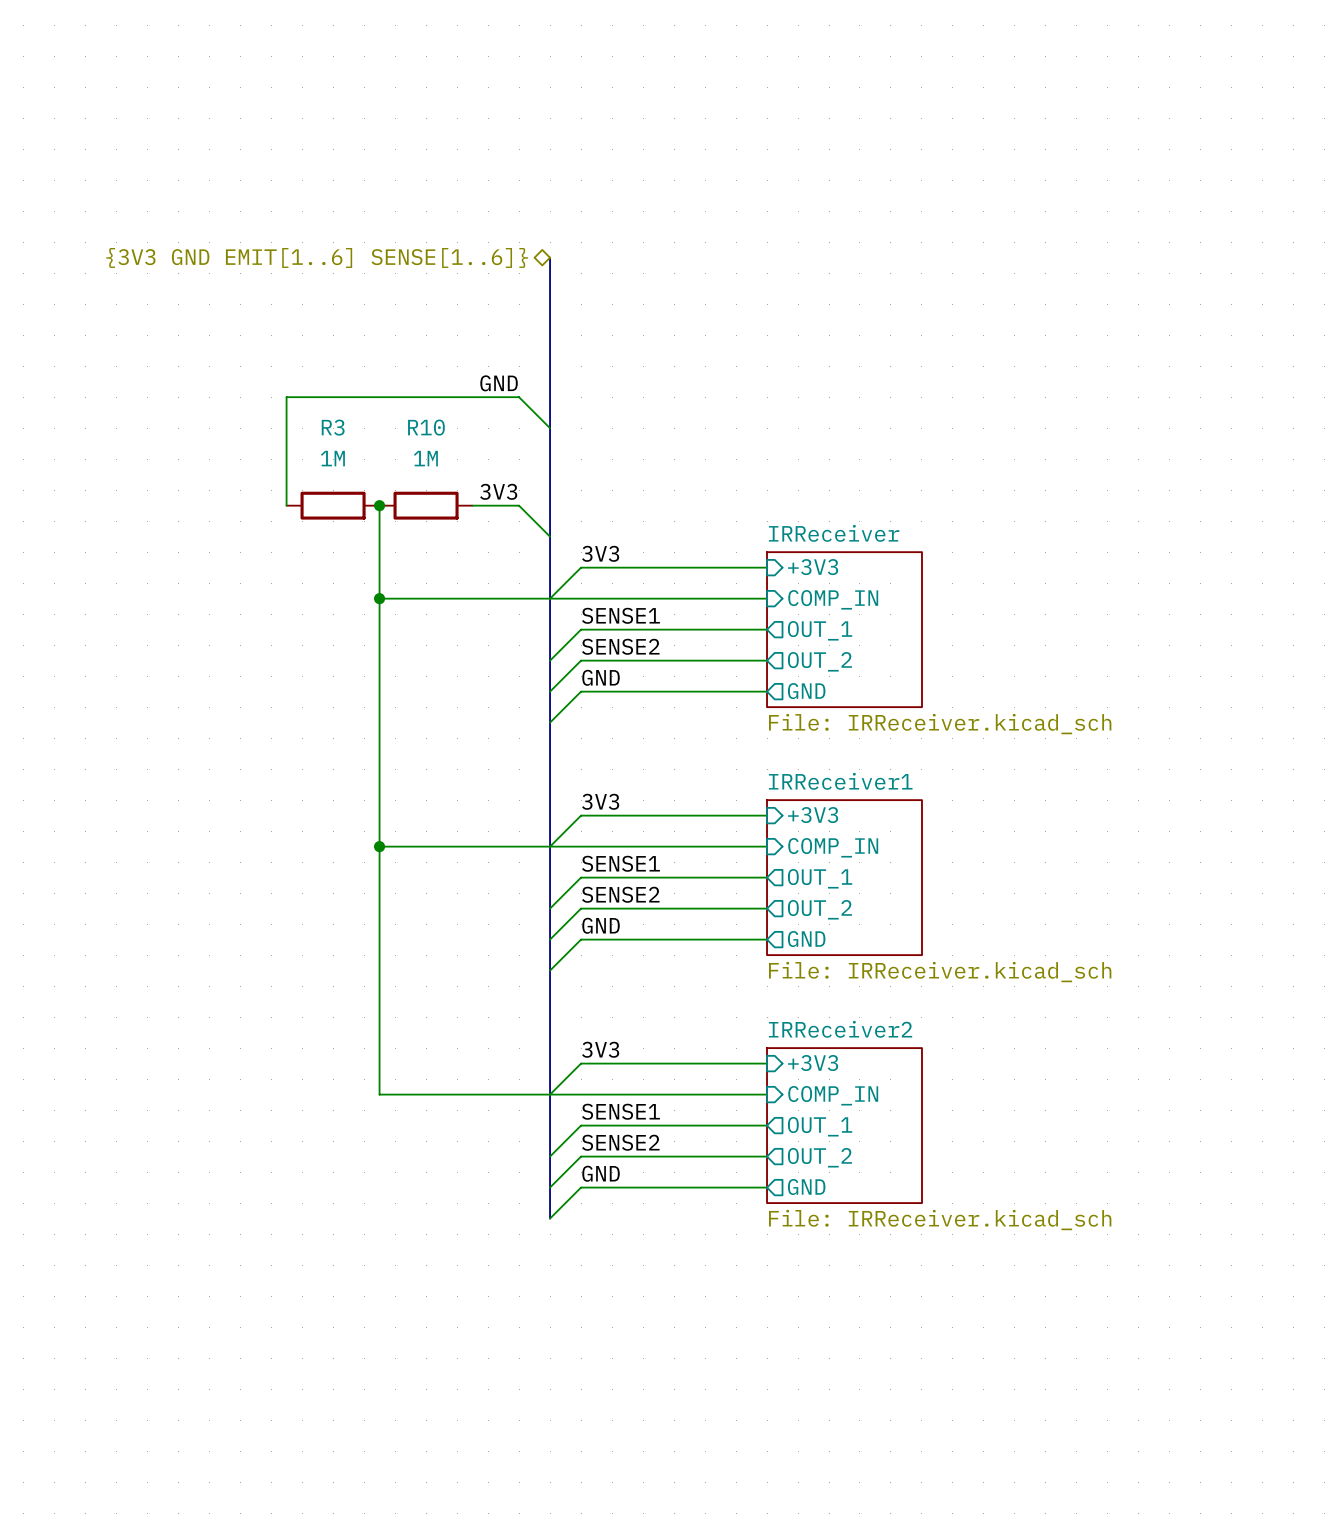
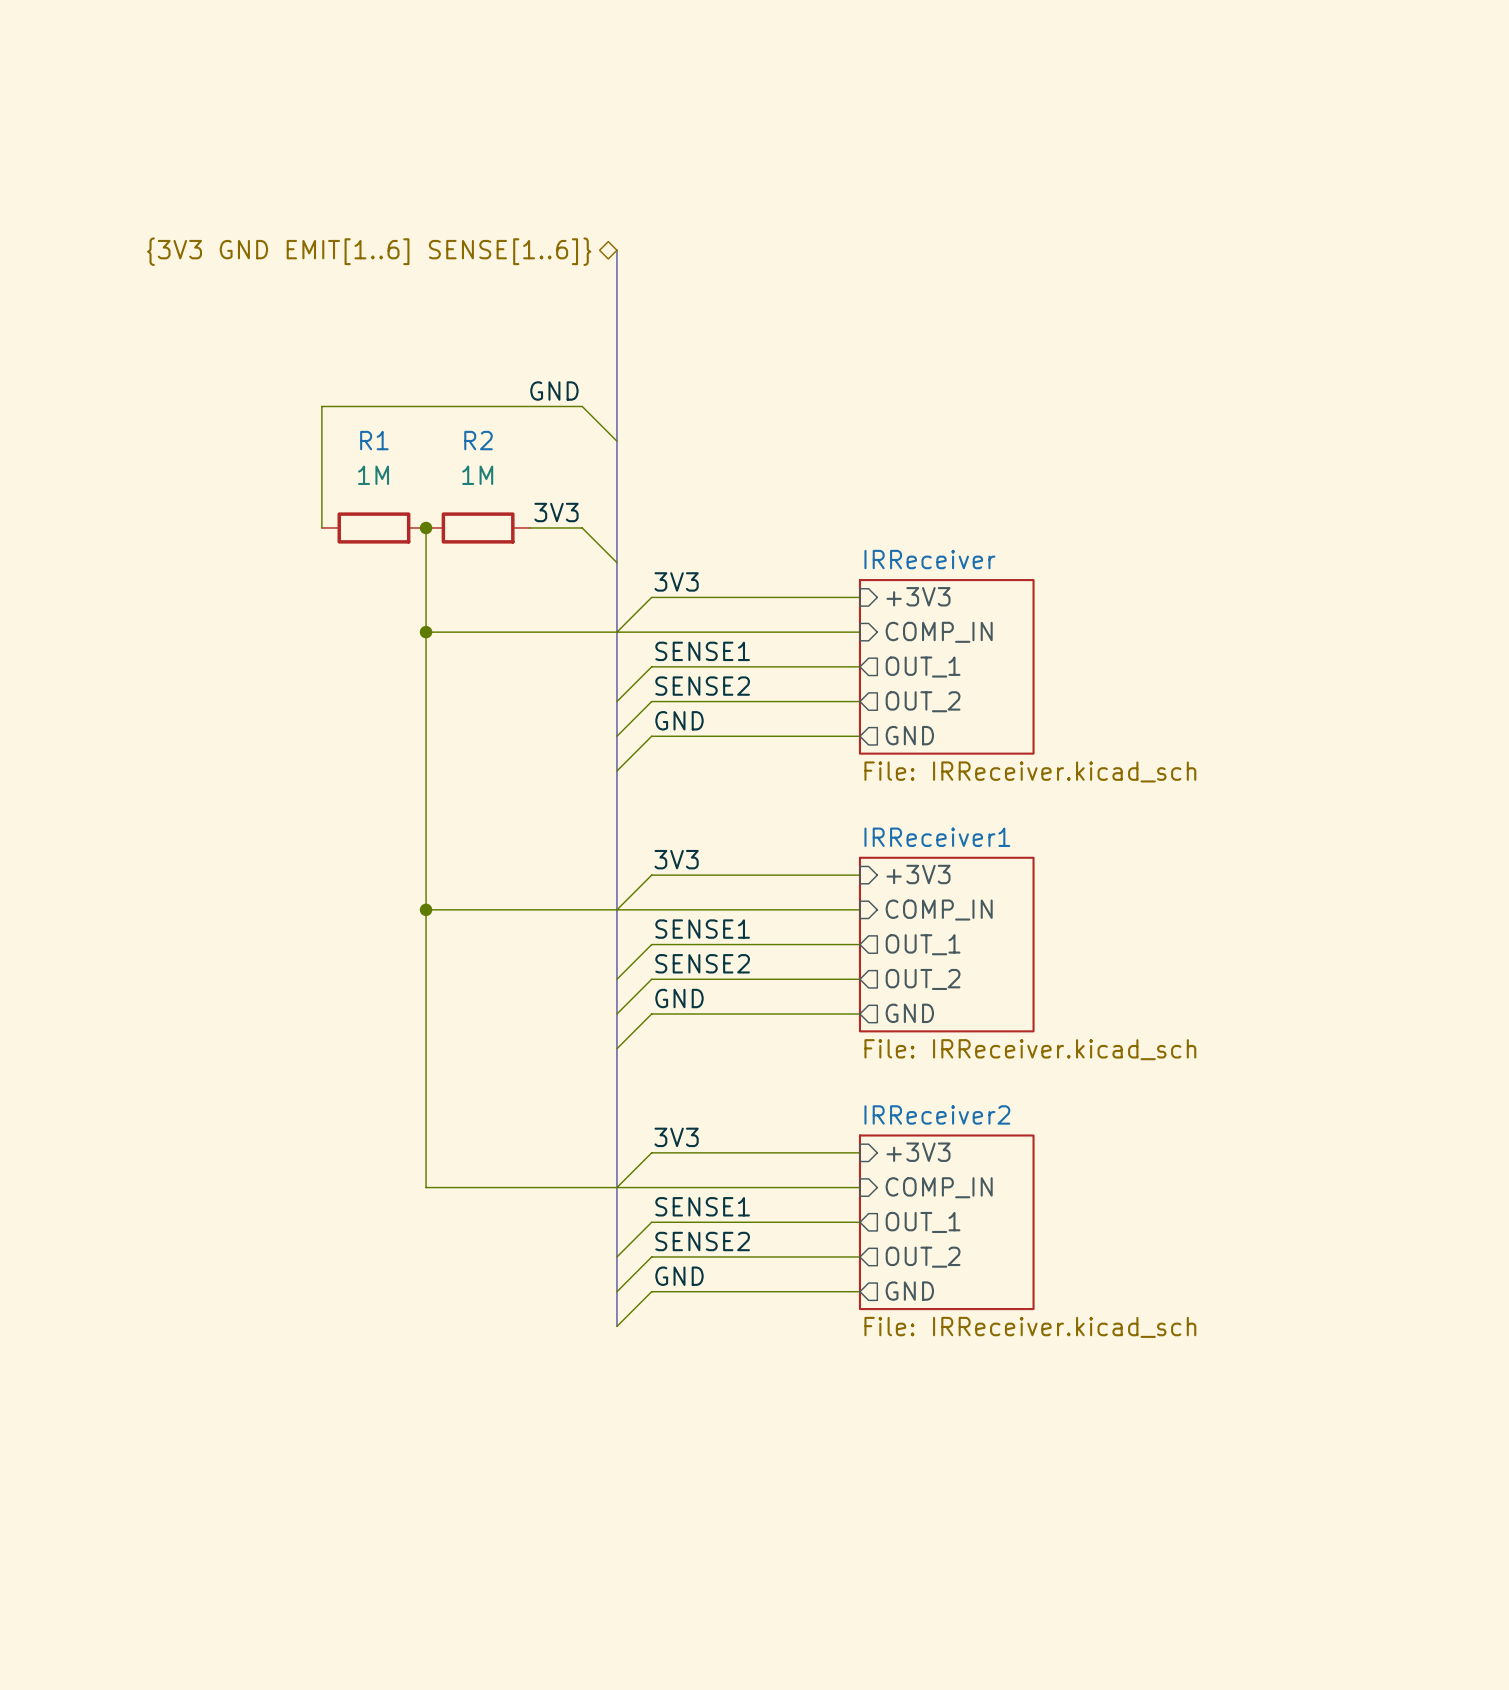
R3 name: R3 (333, 427) -> R1 (374, 440)
R10 name: R10 (426, 427) -> R2 (478, 440)

